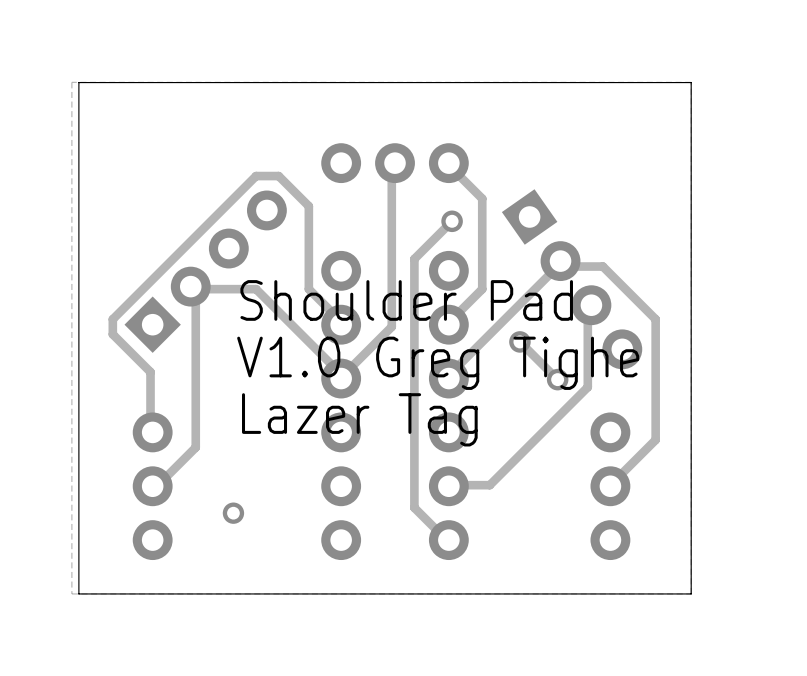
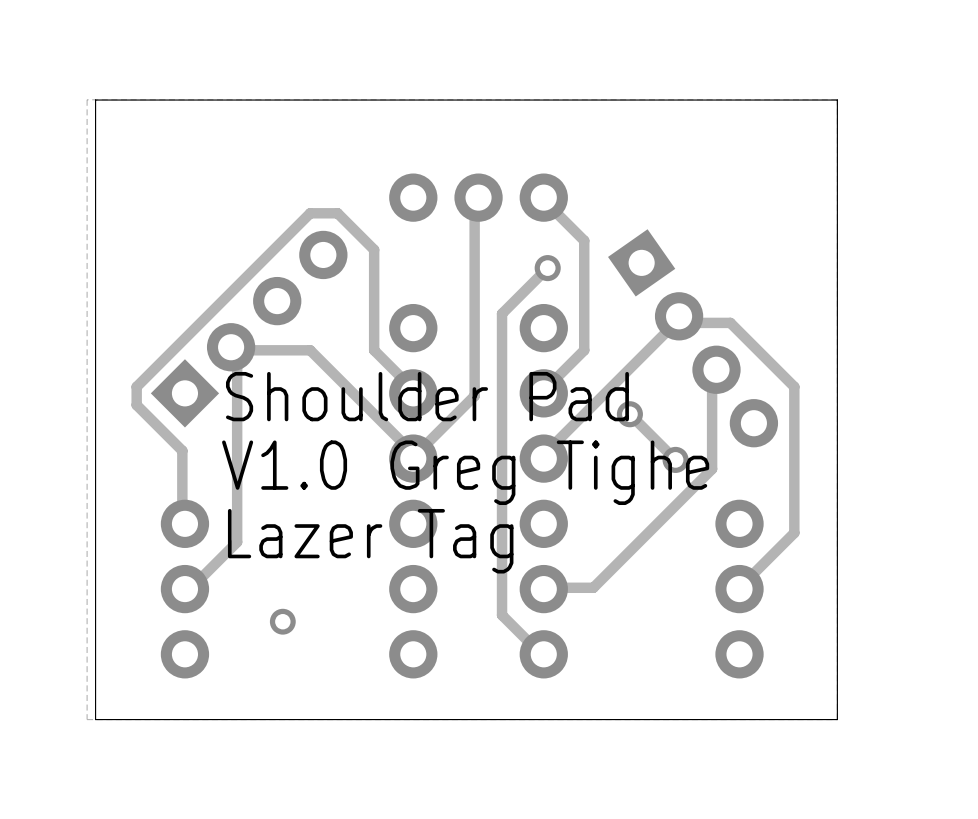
text position: Shoulder Pad (406, 300) -> Shoulder Pad (427, 396)
text position: V1.0 Greg Tighe (438, 363) -> V1.0 Greg Tighe (465, 472)
text position: Lazer Tag (359, 419) -> Lazer Tag (370, 541)

